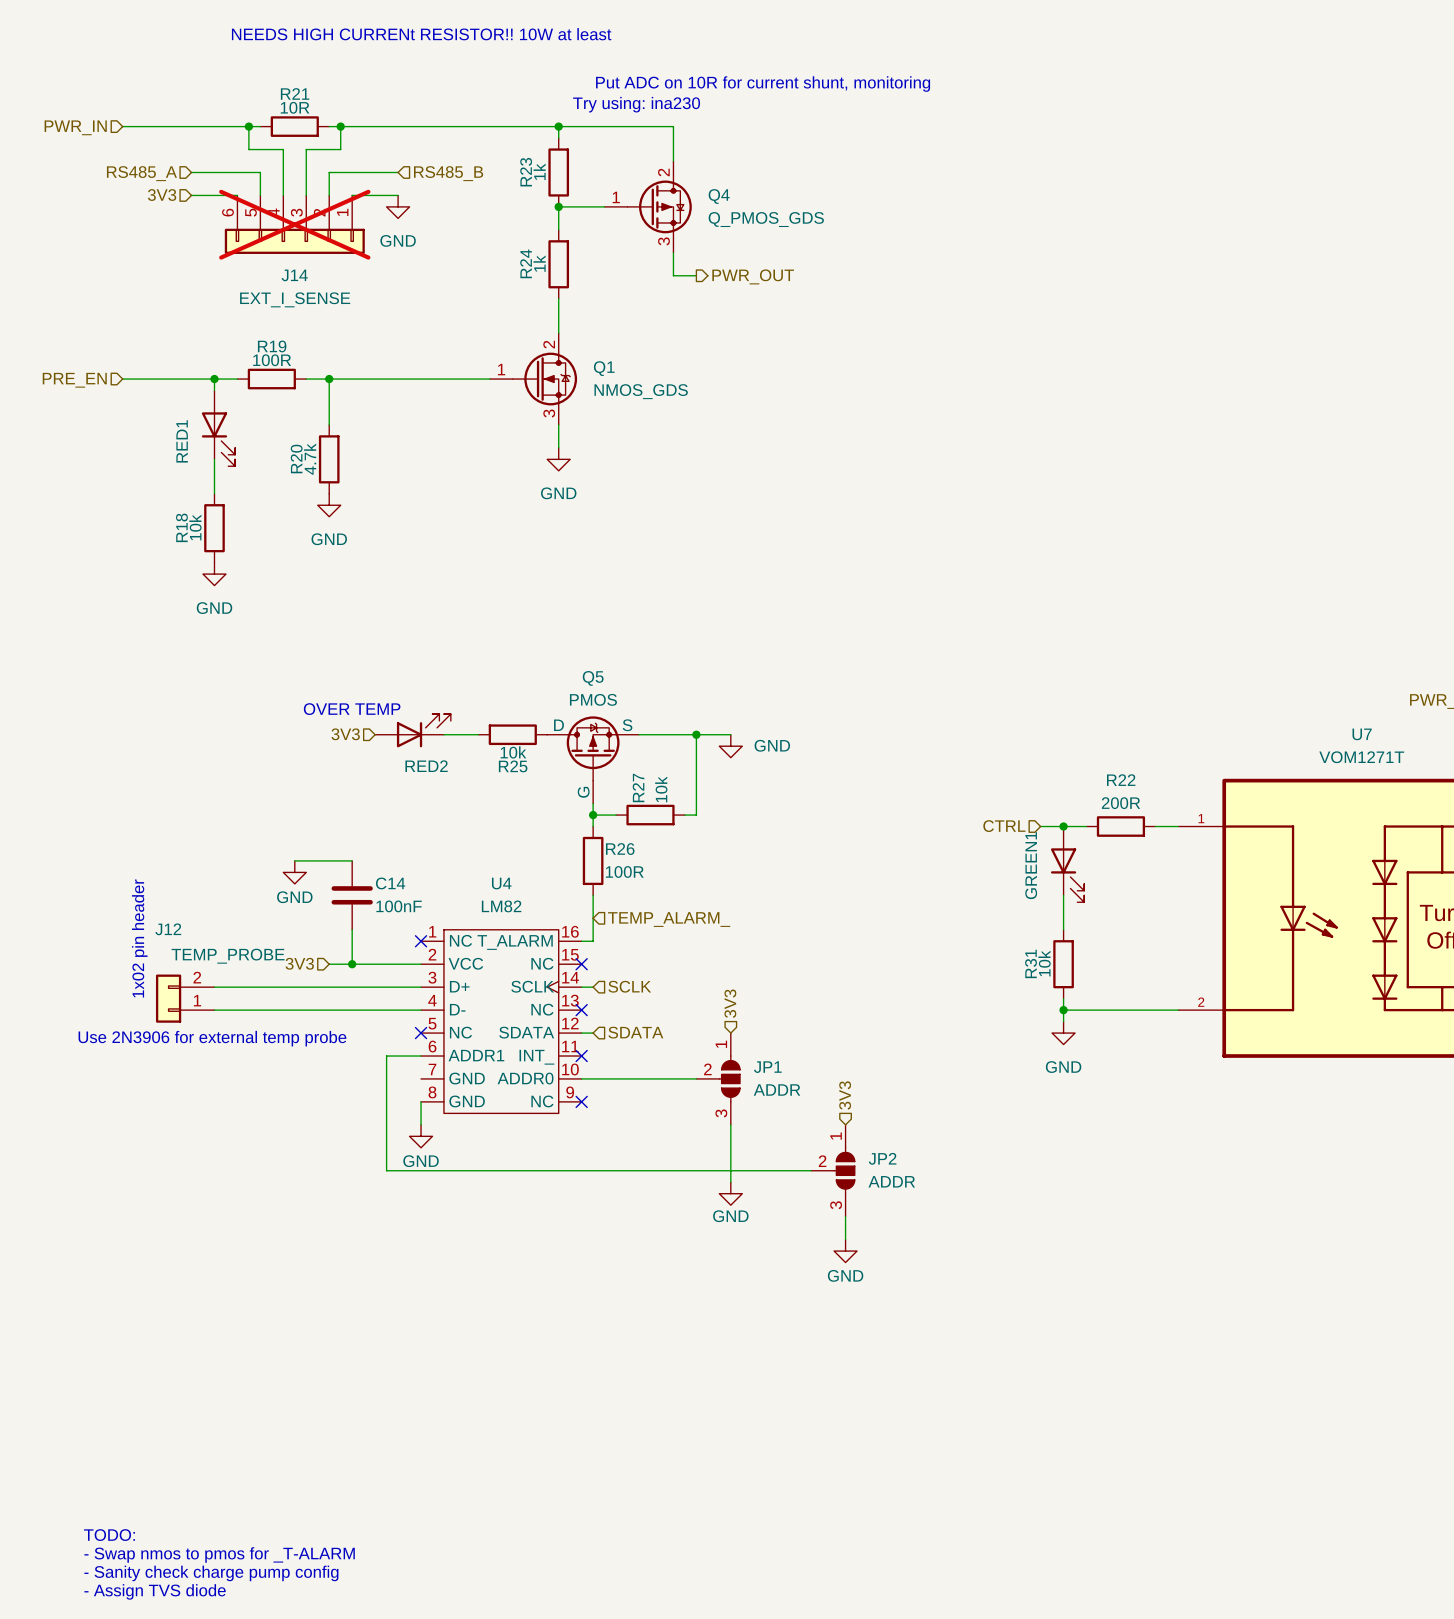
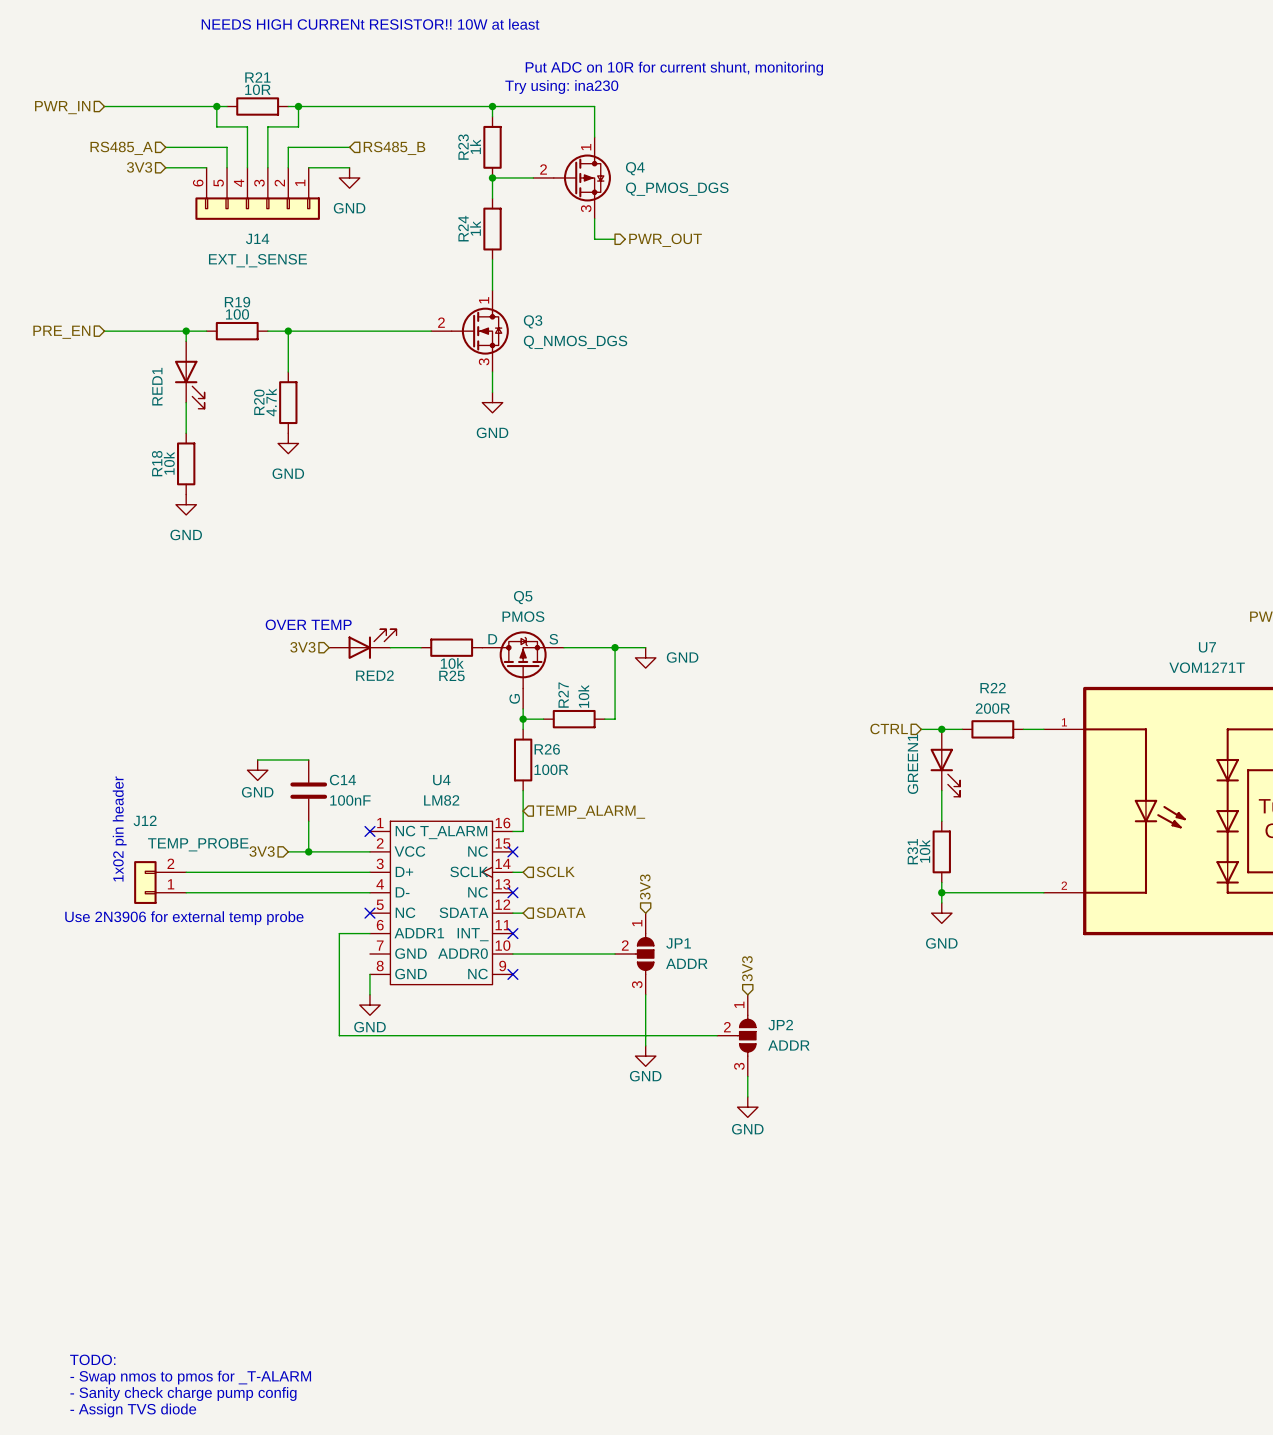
Q4 pin number: 2 (663, 172) -> 1 (586, 147)
Q4 pin number: 1 (616, 197) -> 2 (543, 169)
Q4 value: Q_PMOS_GDS (766, 219) -> Q_PMOS_DGS (677, 189)
J14 do-not-place cross: (294, 224) -> none
R19 value: 100R (272, 360) -> 100 (237, 314)
Q1: NMOS_GDS (533, 379) -> none
Q3: none -> Q_NMOS_DGS (470, 331)

